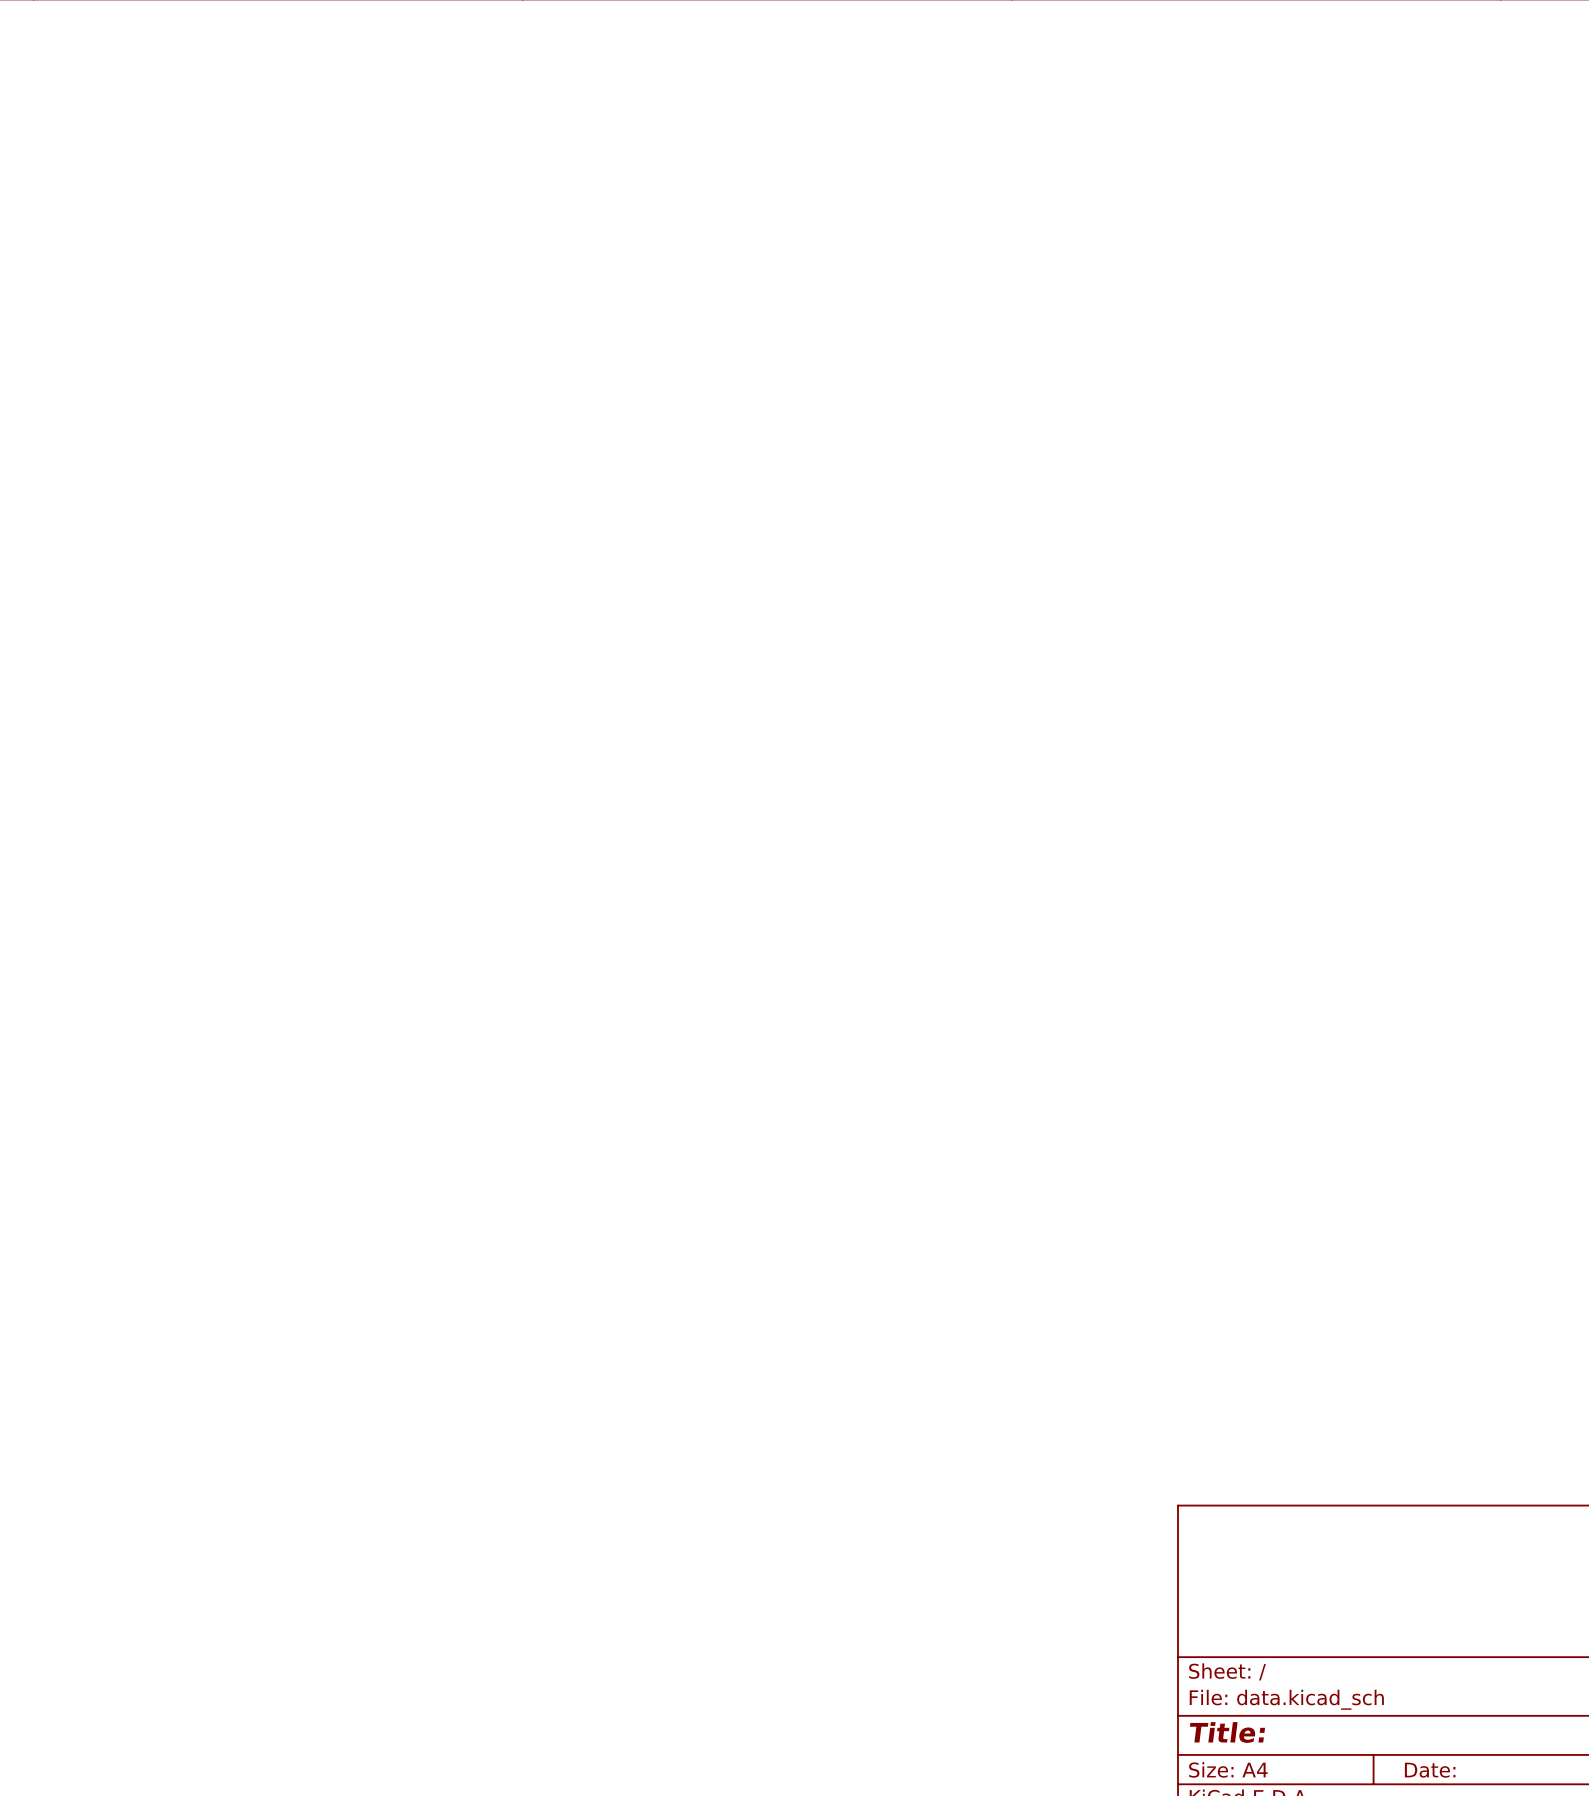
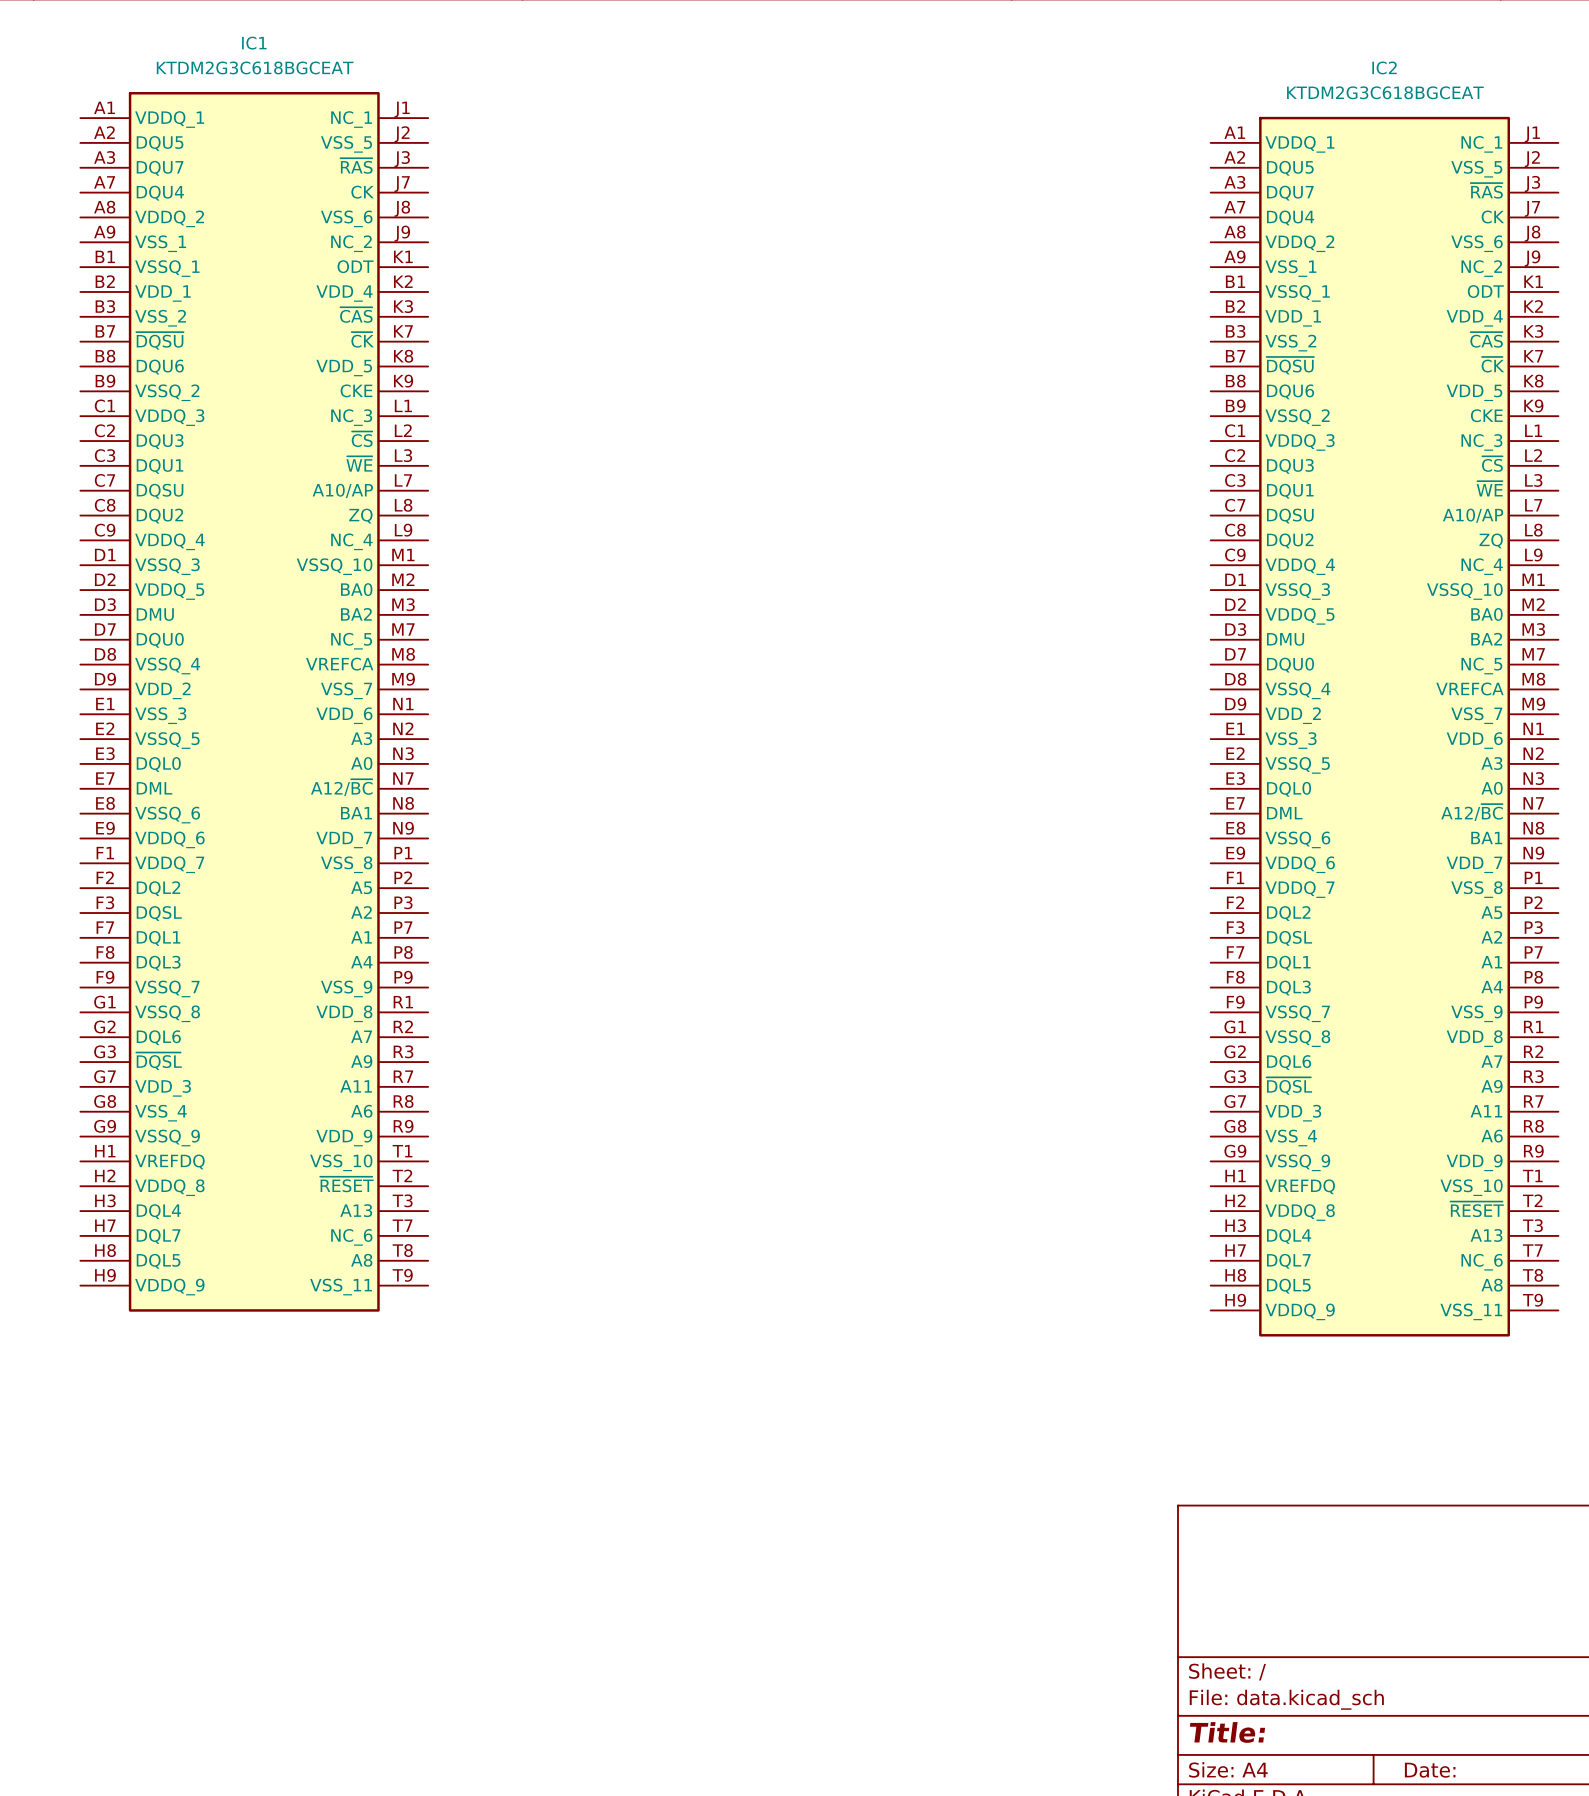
IC1: none -> KTDM2G3C618BGCEAT (254, 701)
IC2: none -> KTDM2G3C618BGCEAT (1384, 726)

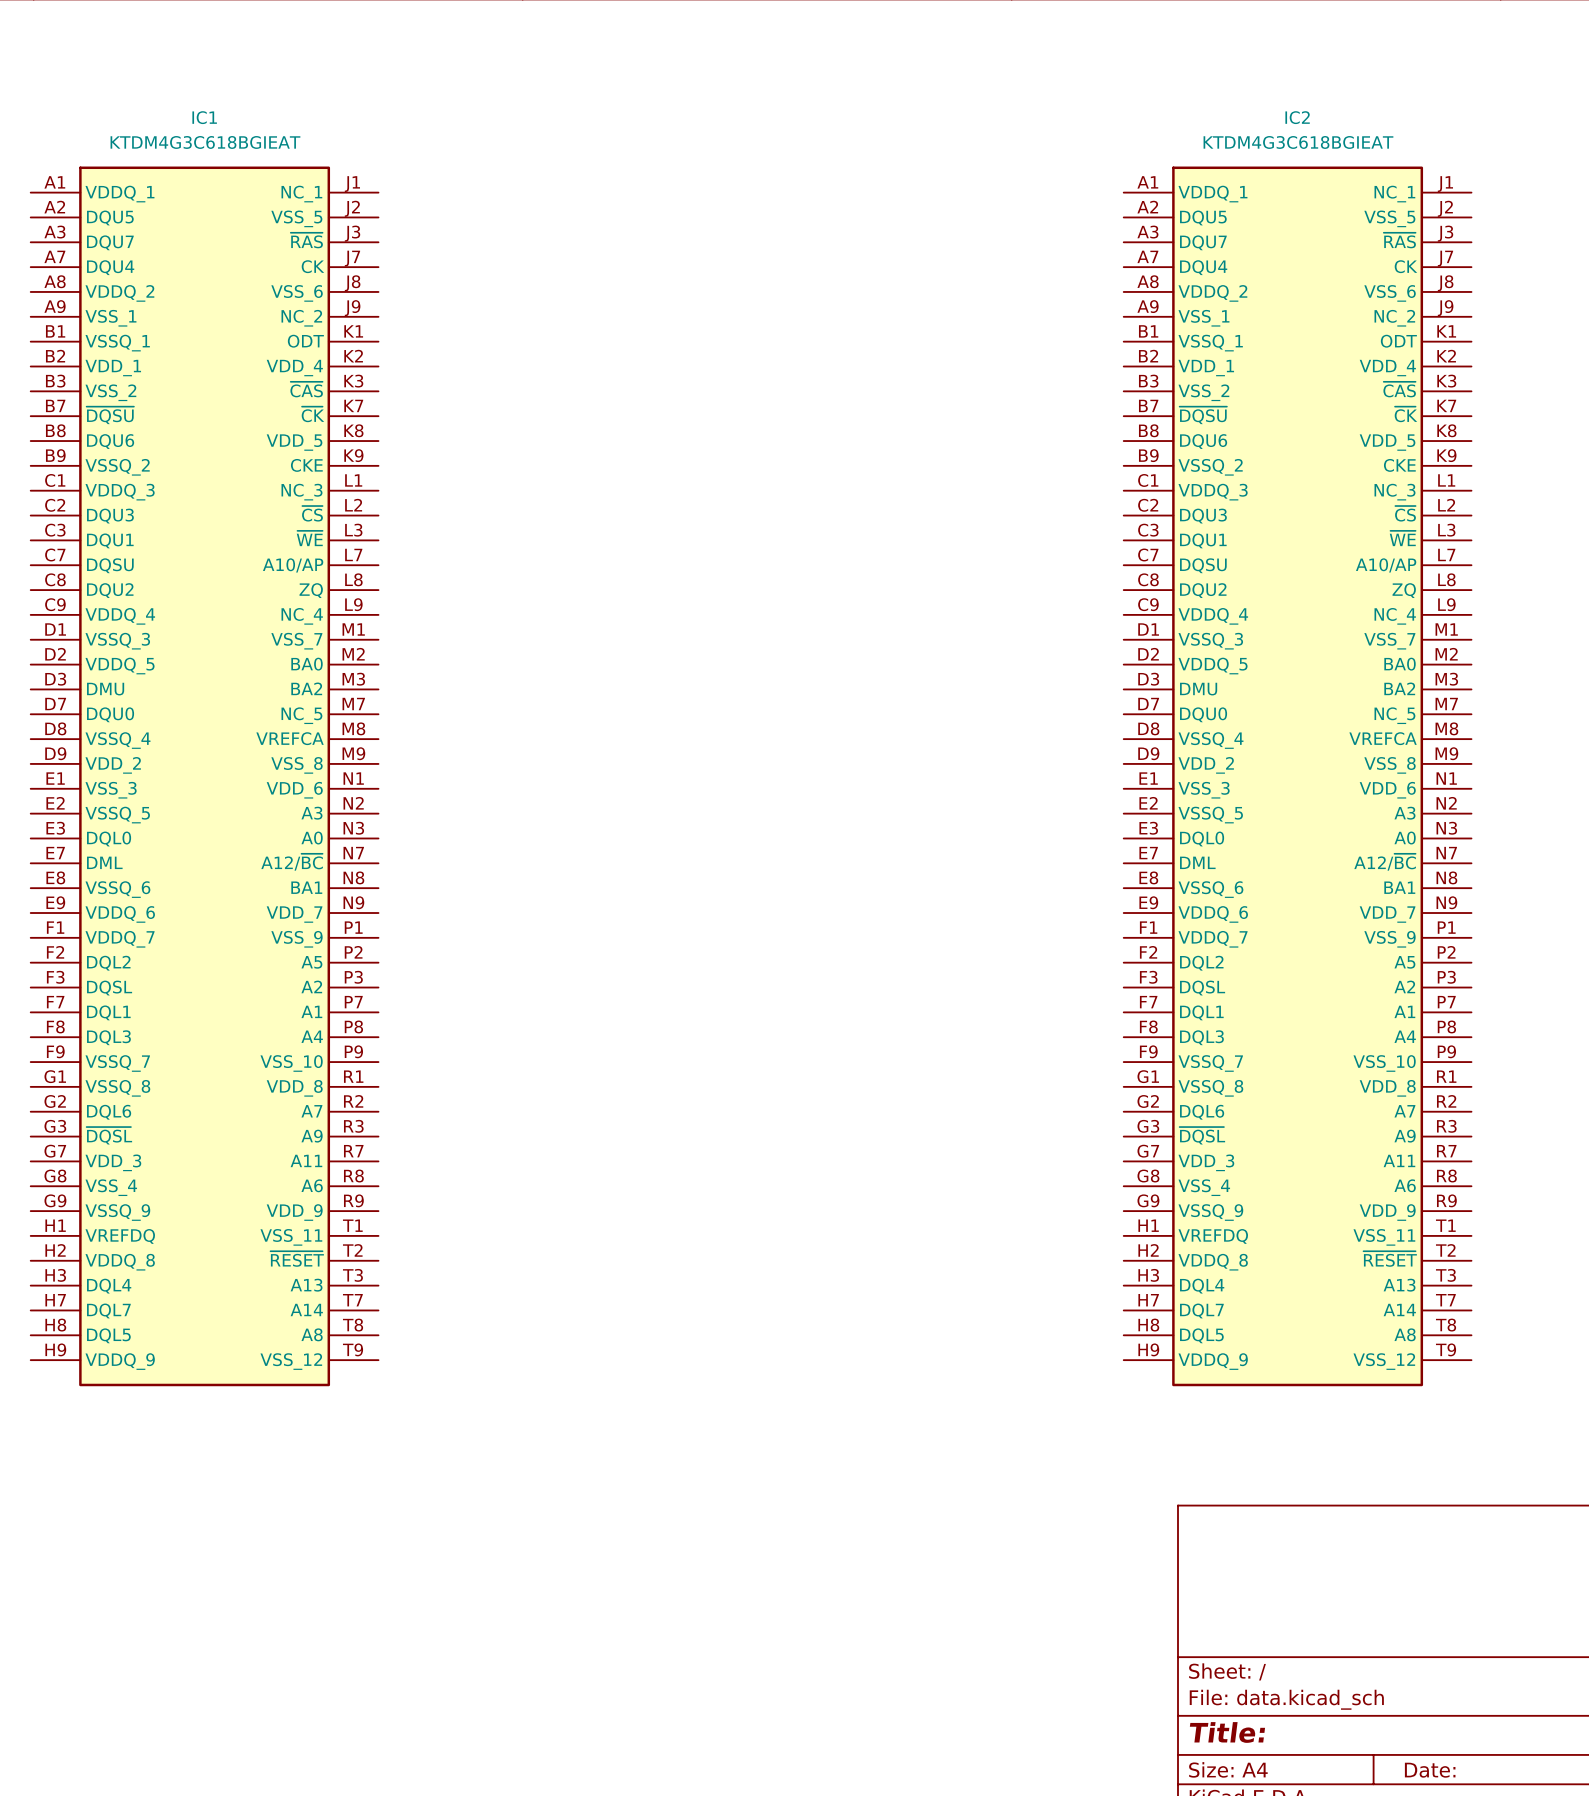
IC1 value: KTDM2G3C618BGCEAT (255, 67) -> KTDM4G3C618BGIEAT (205, 142)
IC2 value: KTDM2G3C618BGCEAT (1385, 92) -> KTDM4G3C618BGIEAT (1298, 142)
IC1 pin name: VSSQ_10 (334, 566) -> VSS_7 (296, 641)
IC2 pin name: VSSQ_10 (1464, 591) -> VSS_7 (1389, 641)
IC1 pin name: VSS_7 (346, 690) -> VSS_8 (297, 765)
IC1 position: (254, 701) -> (204, 776)
IC2 pin name: VSS_7 (1476, 715) -> VSS_8 (1390, 765)
IC2 position: (1384, 726) -> (1297, 776)
IC1 pin name: VSS_8 (346, 864) -> VSS_9 (296, 939)
IC2 pin name: VSS_8 (1476, 889) -> VSS_9 (1389, 939)
IC1 pin name: VSS_9 (346, 988) -> VSS_10 (291, 1063)
IC2 pin name: VSS_9 (1476, 1013) -> VSS_10 (1384, 1063)
IC1 pin name: VSS_10 (341, 1162) -> VSS_11 (291, 1237)
IC2 pin name: VSS_10 (1471, 1187) -> VSS_11 (1384, 1237)
IC1 pin name: NC_6 (351, 1237) -> A14 (306, 1309)
IC2 pin name: NC_6 (1482, 1262) -> A14 (1399, 1309)
IC1 pin name: VSS_11 (341, 1287) -> VSS_12 (291, 1361)
IC2 pin name: VSS_11 (1471, 1311) -> VSS_12 (1384, 1361)

